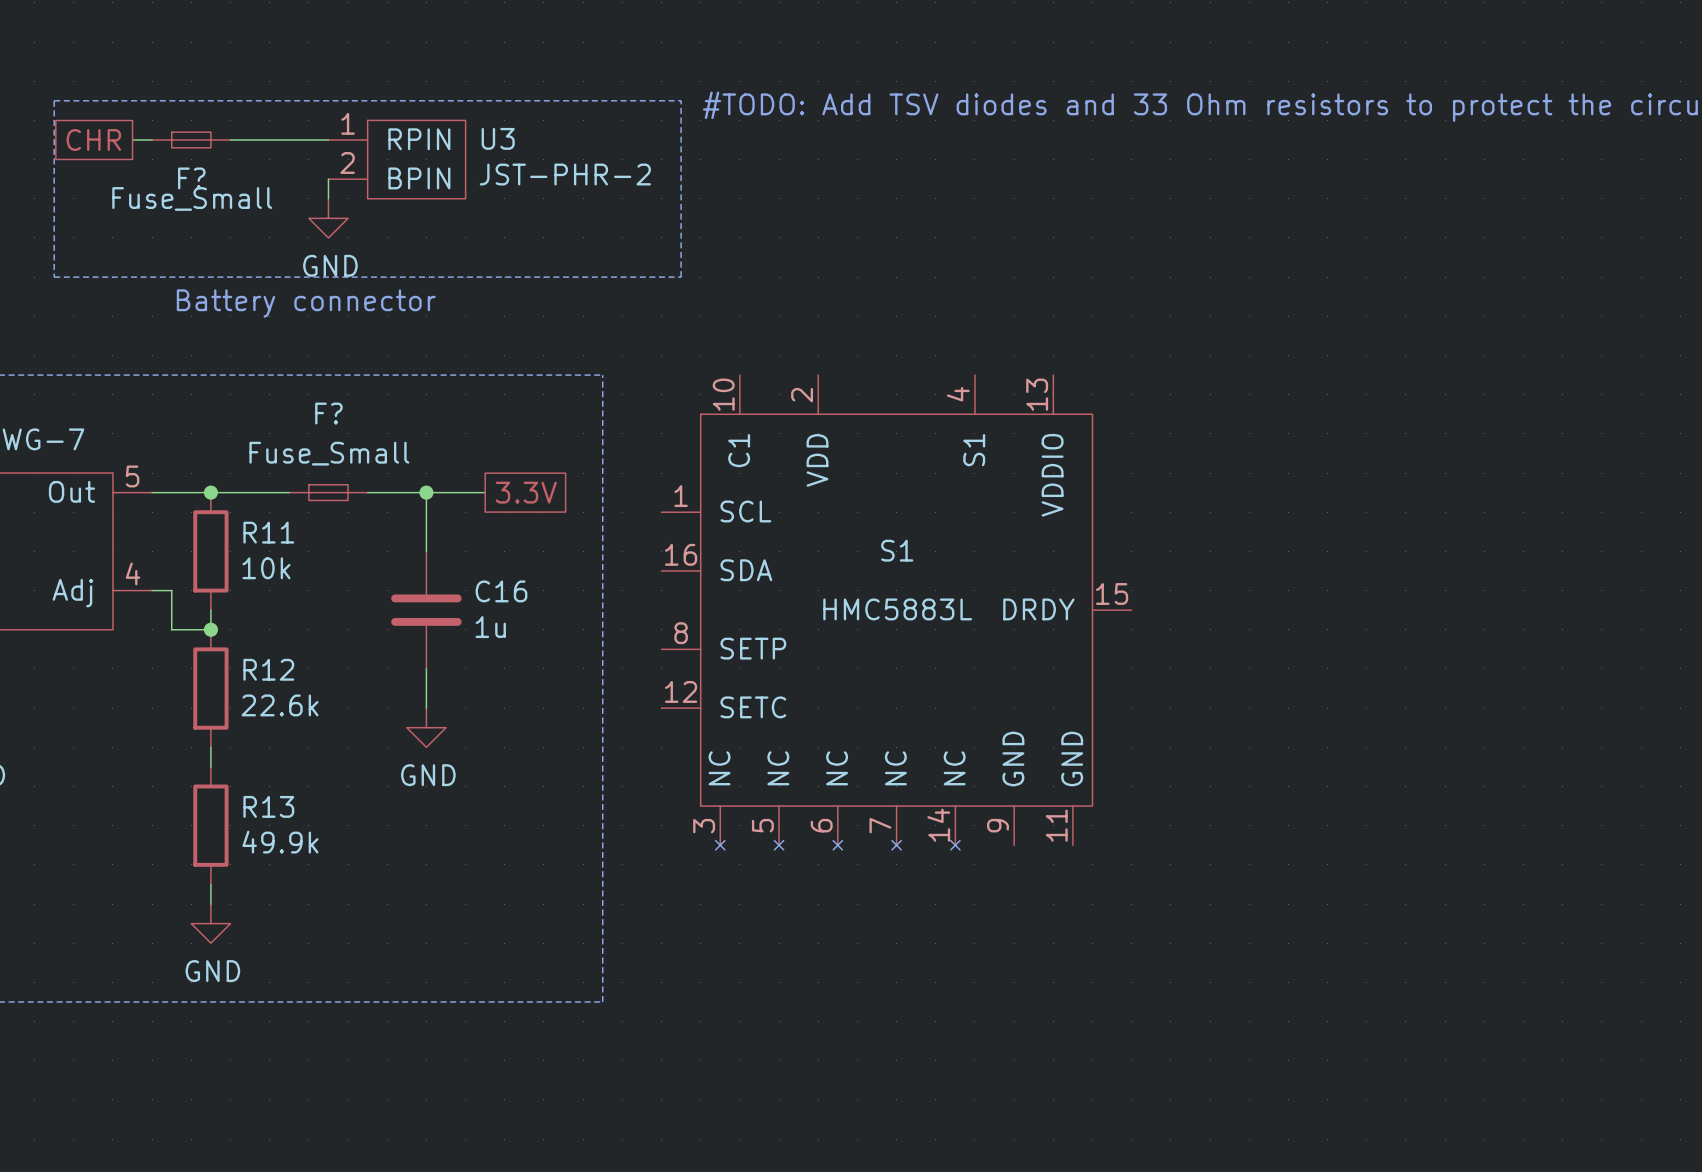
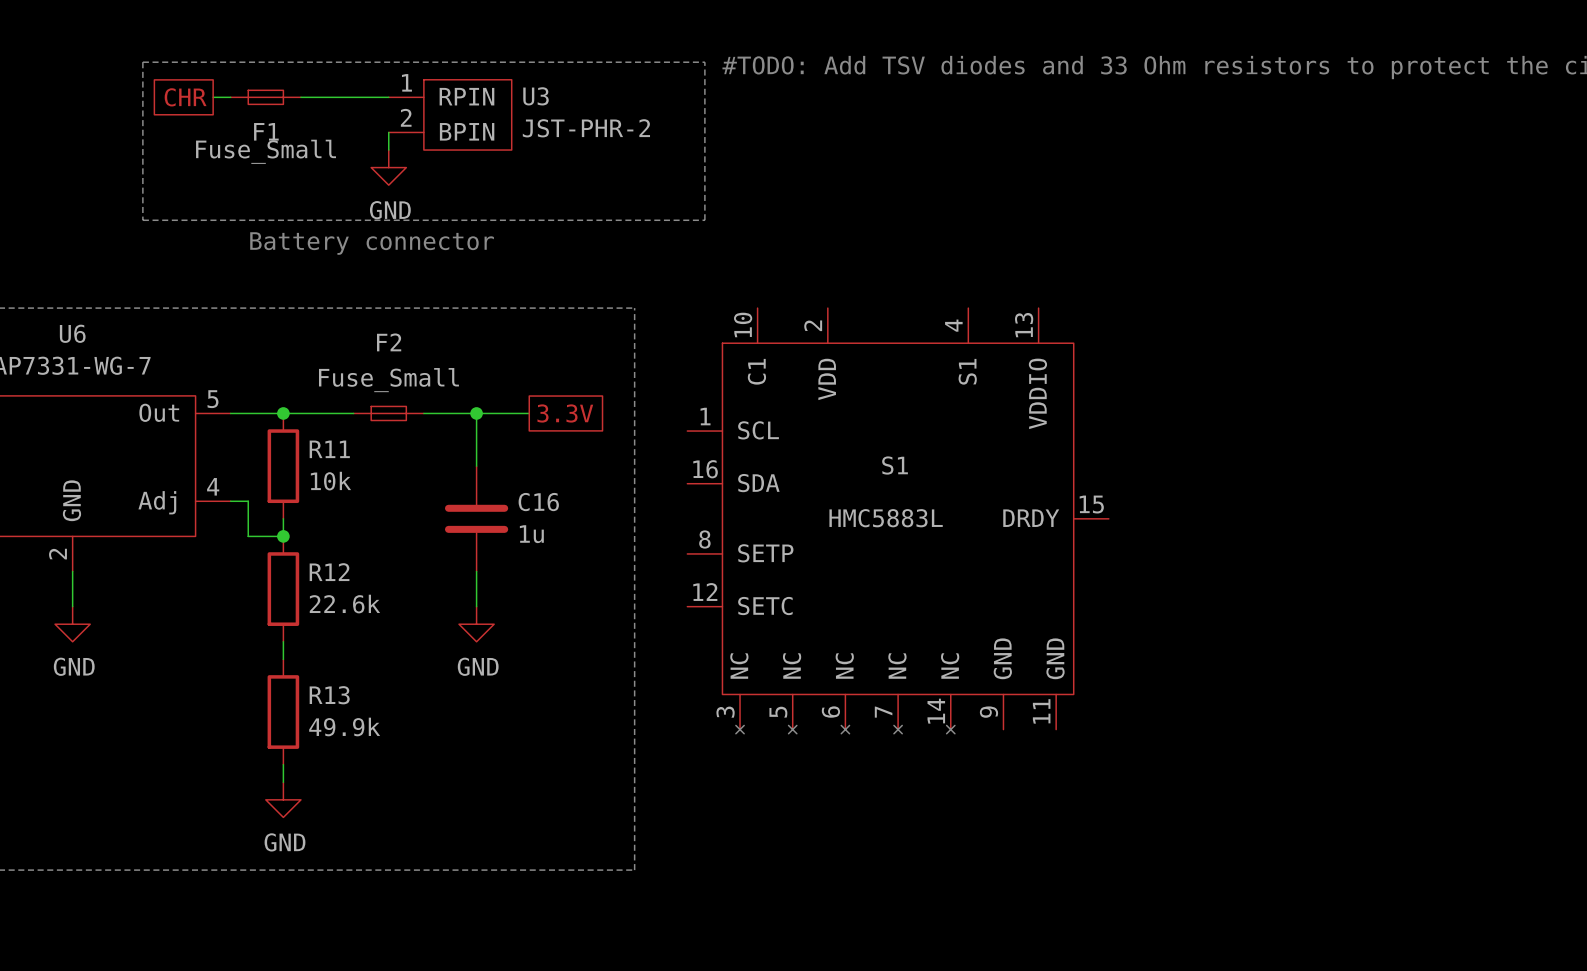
F? name: F? (191, 178) -> F1 (266, 131)
F? name: F? (328, 413) -> F2 (389, 342)

